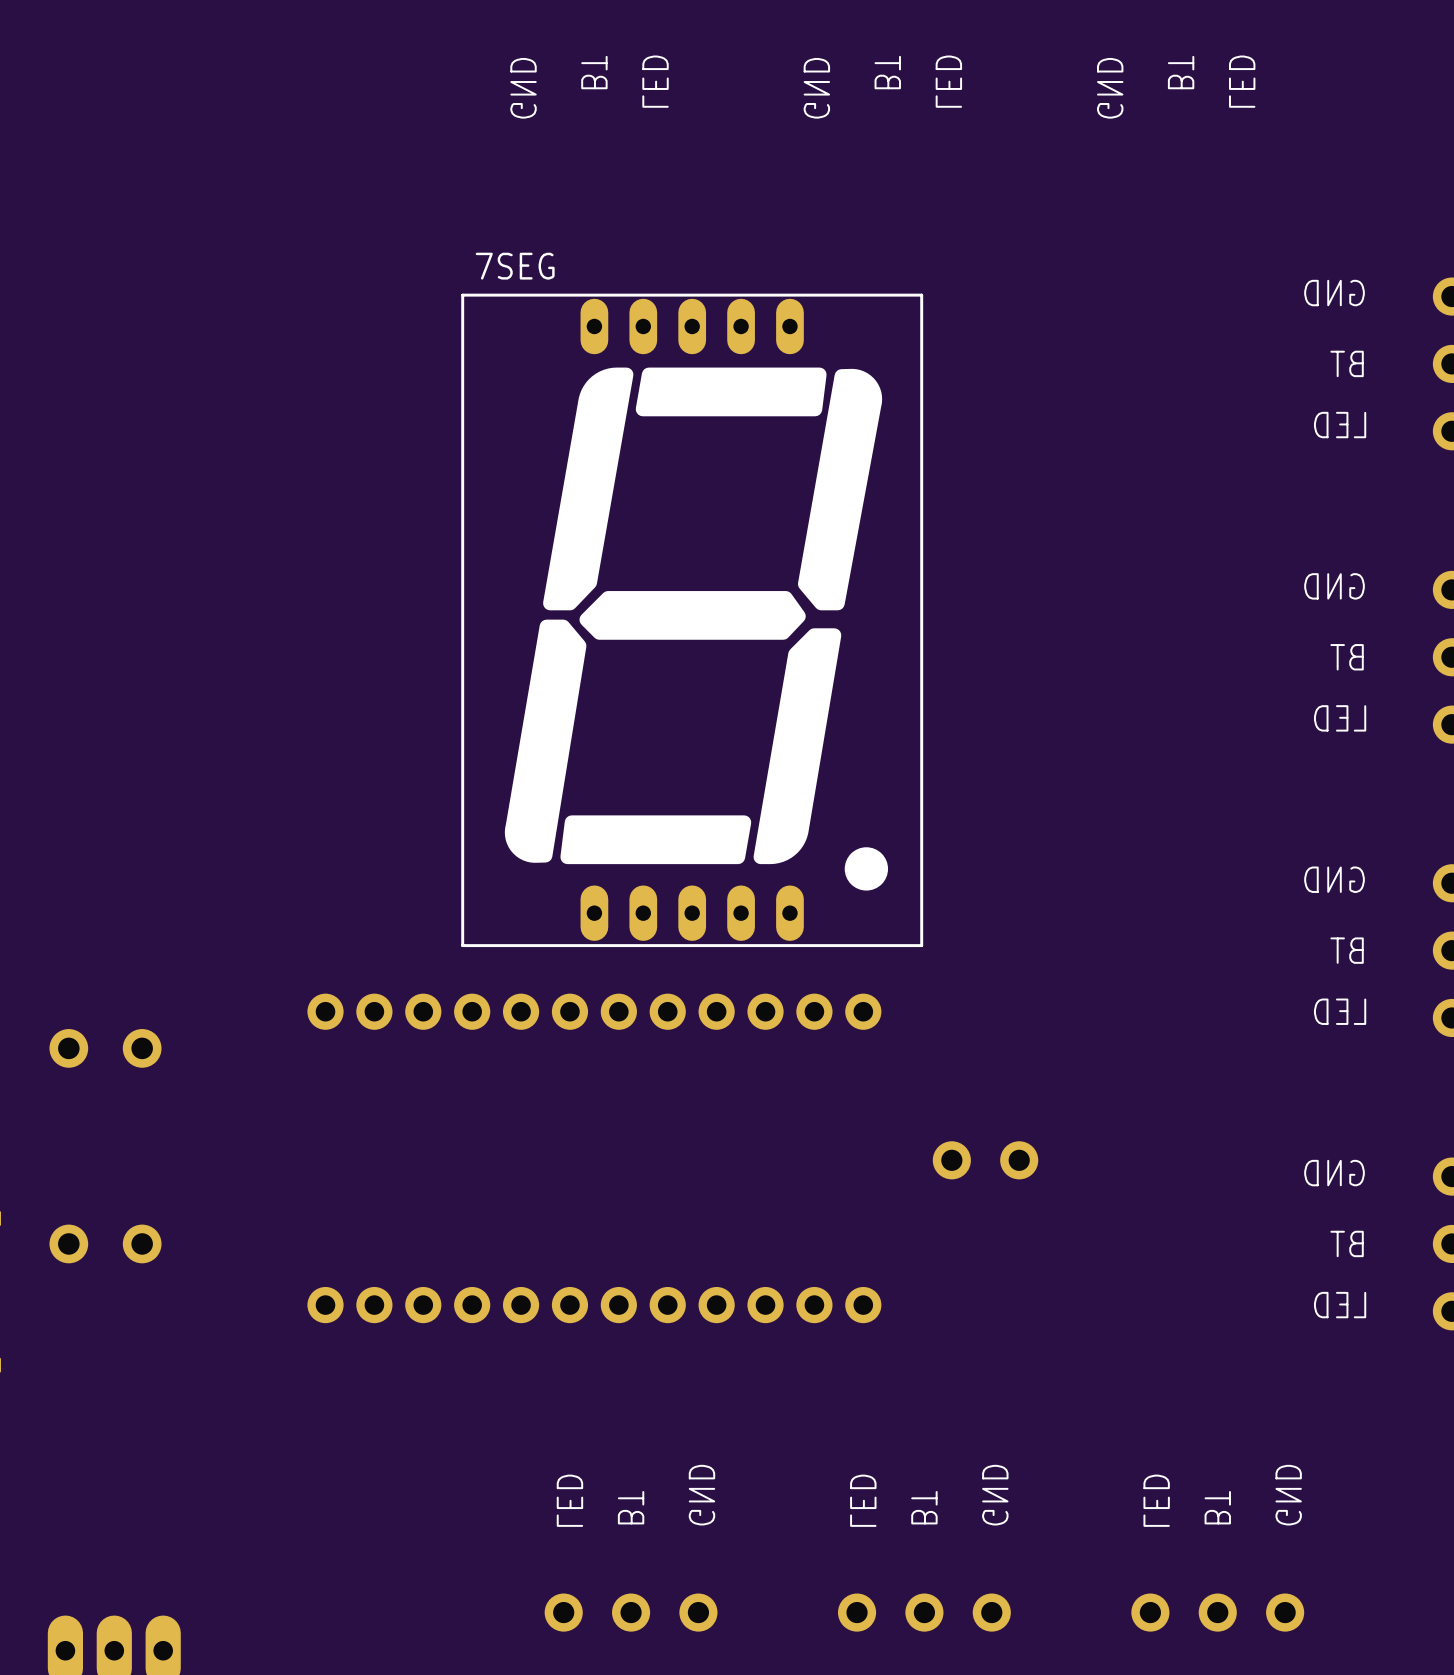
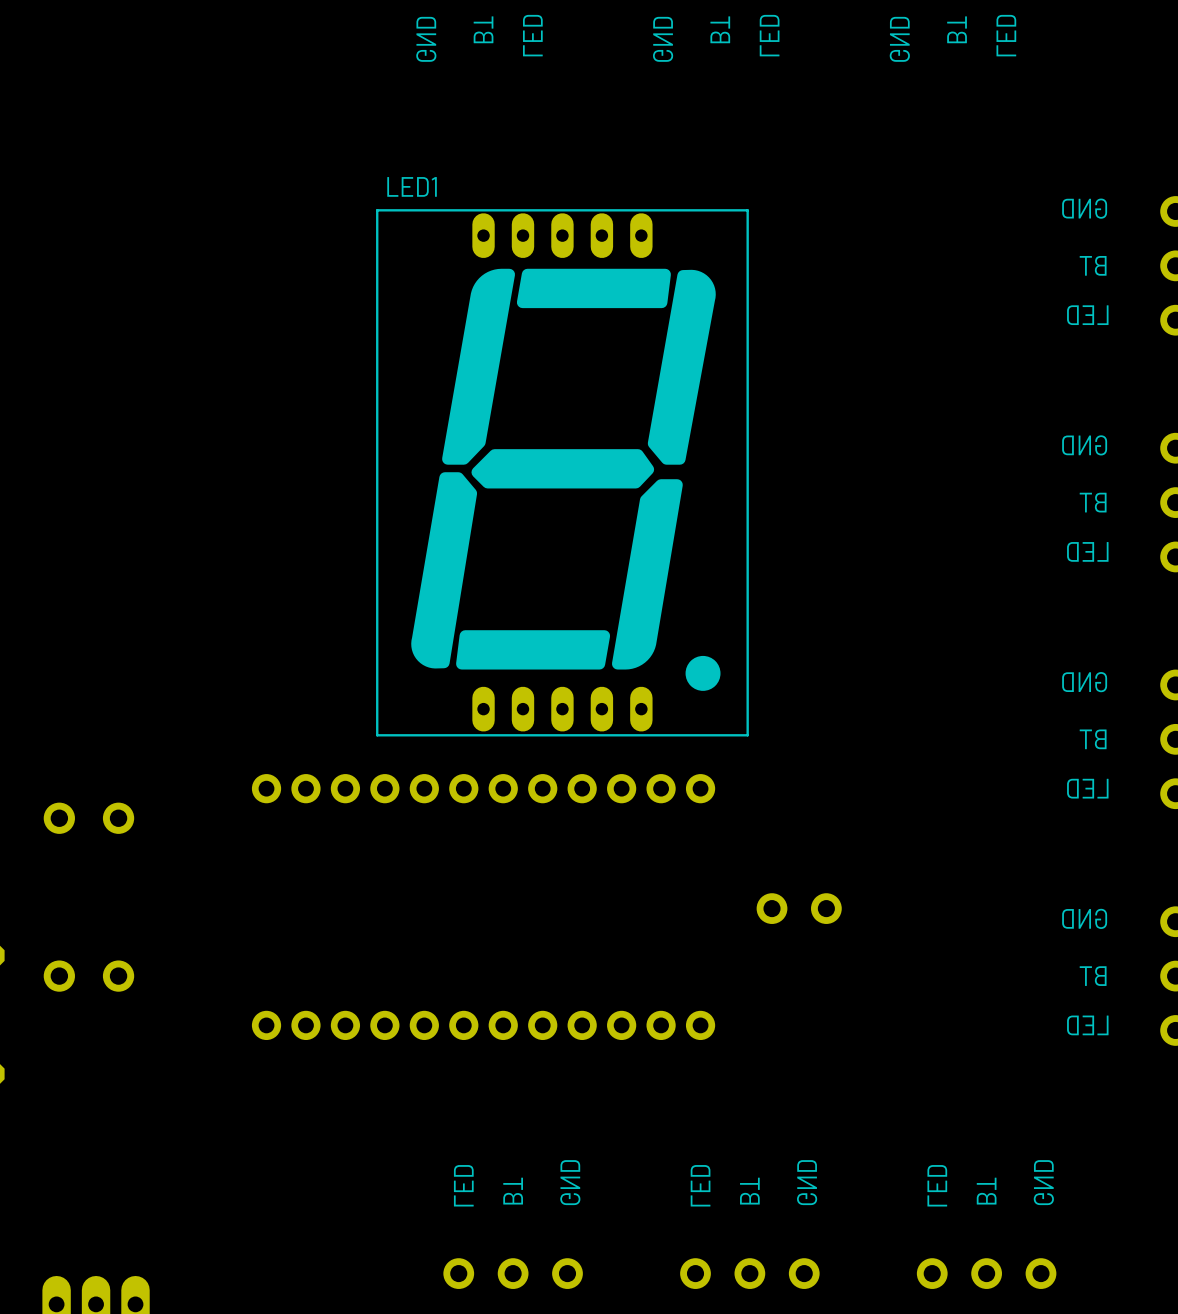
7SEG name: 7SEG (515, 266) -> LED1 (412, 186)

